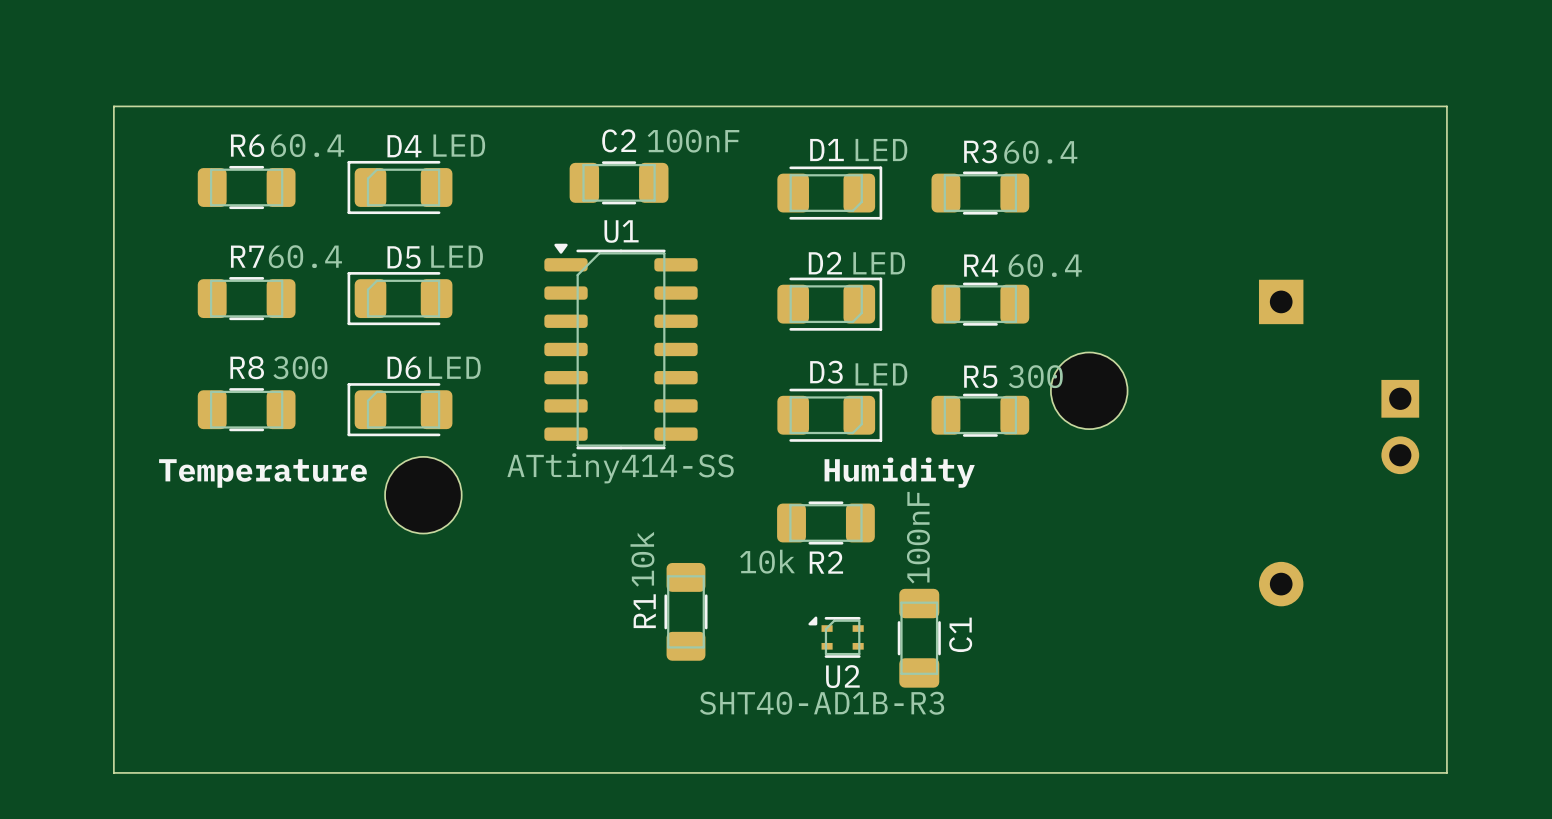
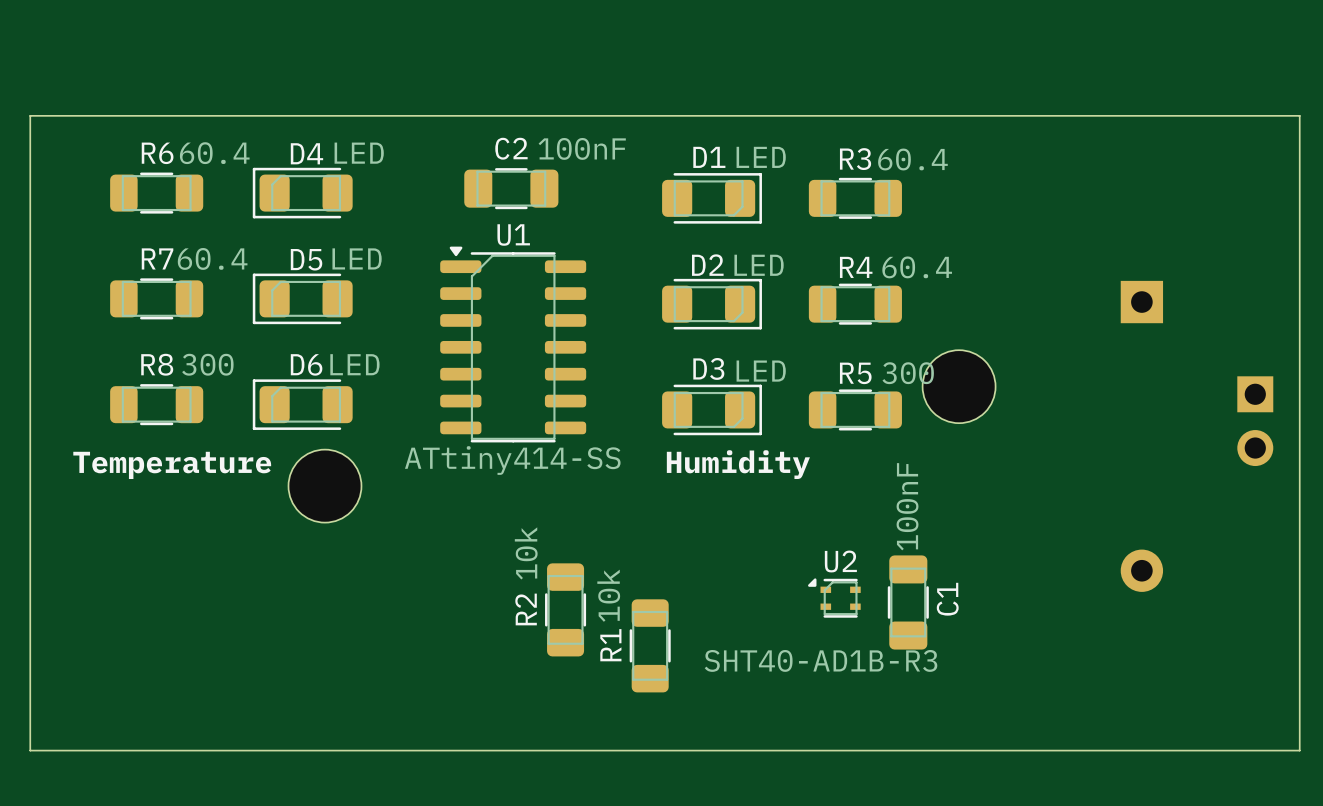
text position: Humidity (899, 472) -> Humidity (738, 464)
R2 rotation: 0° (825, 522) -> 90° clockwise (565, 609)
R2 position: (825, 522) -> (565, 609)
R1 position: (685, 611) -> (650, 645)
U2 position: (836, 637) -> (834, 598)
C1 position: (919, 638) -> (908, 602)
U2 name position: U2 (842, 676) -> U2 (840, 561)

